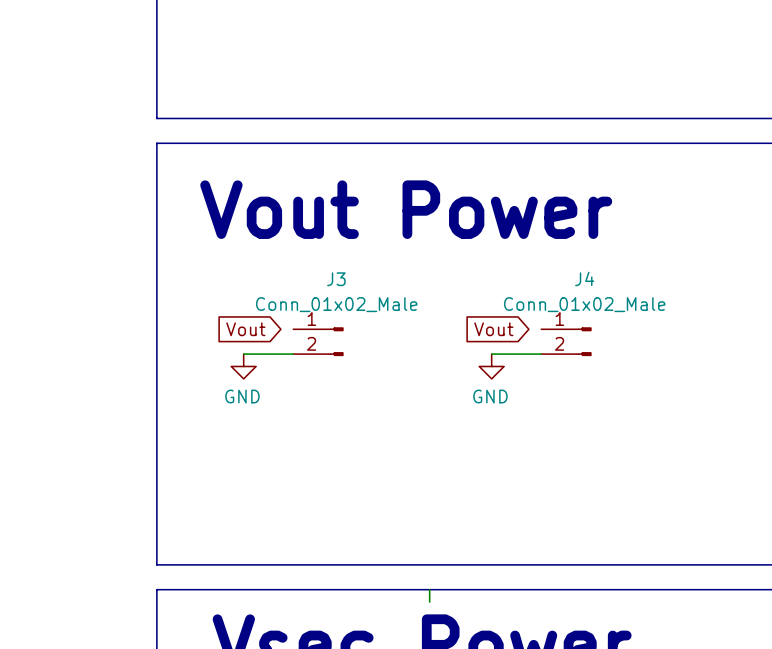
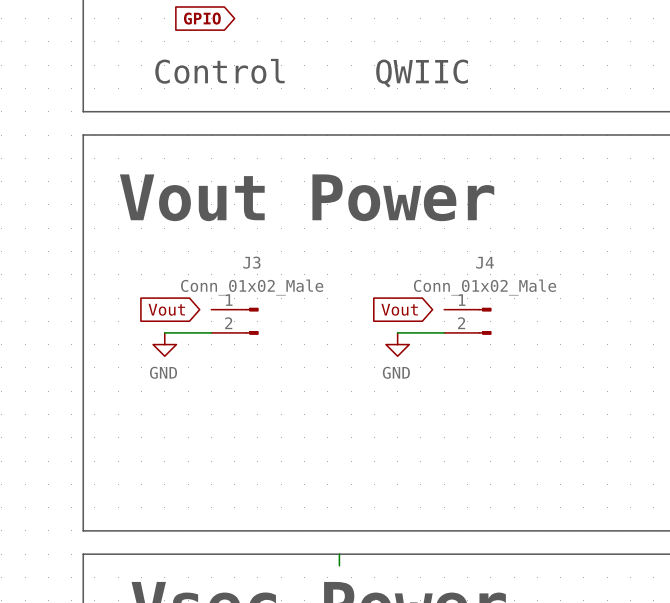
global label: none -> GPIO (202, 18)
text: none -> Control (219, 71)
text: none -> QWIIC (422, 73)

